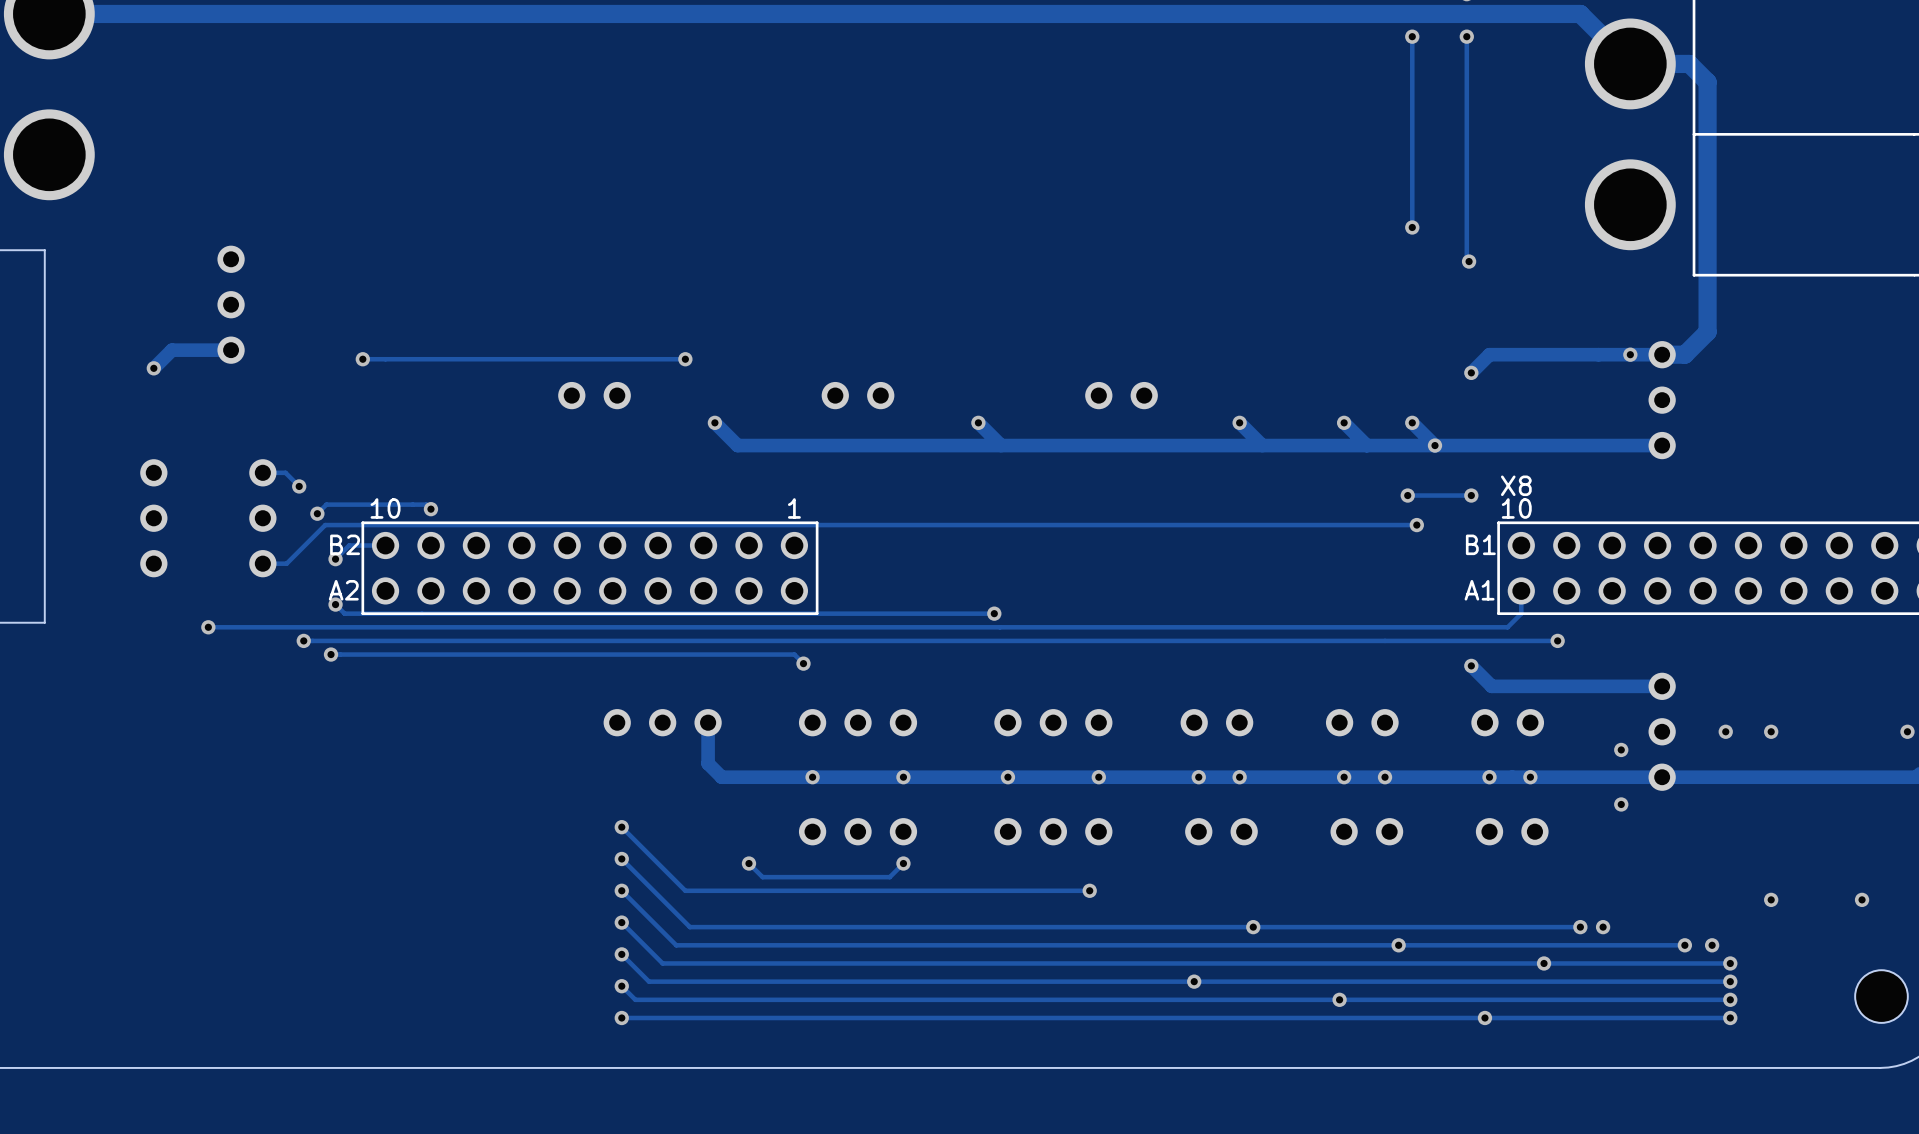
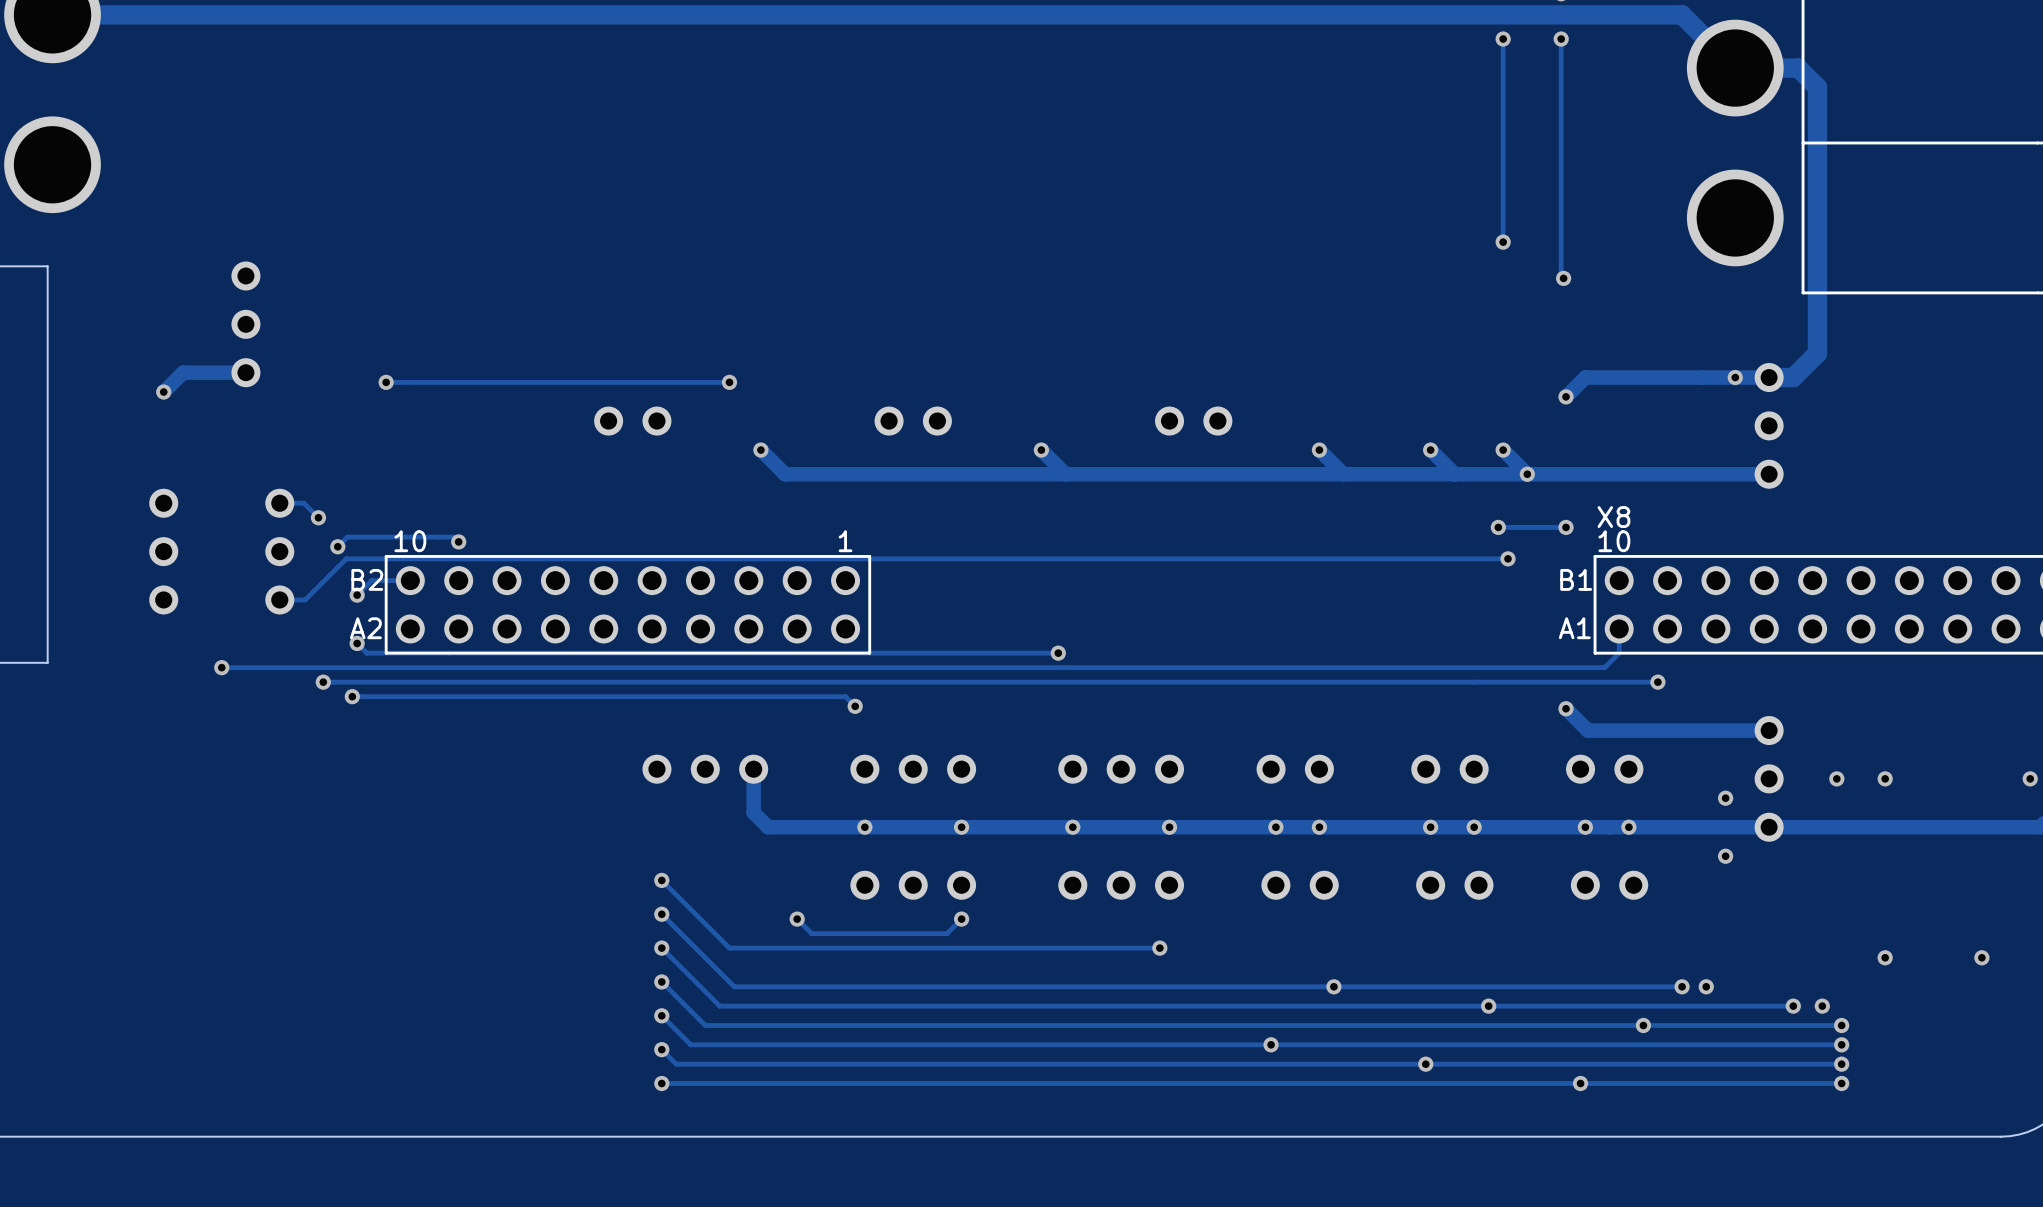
part: (1881, 996) -> none

